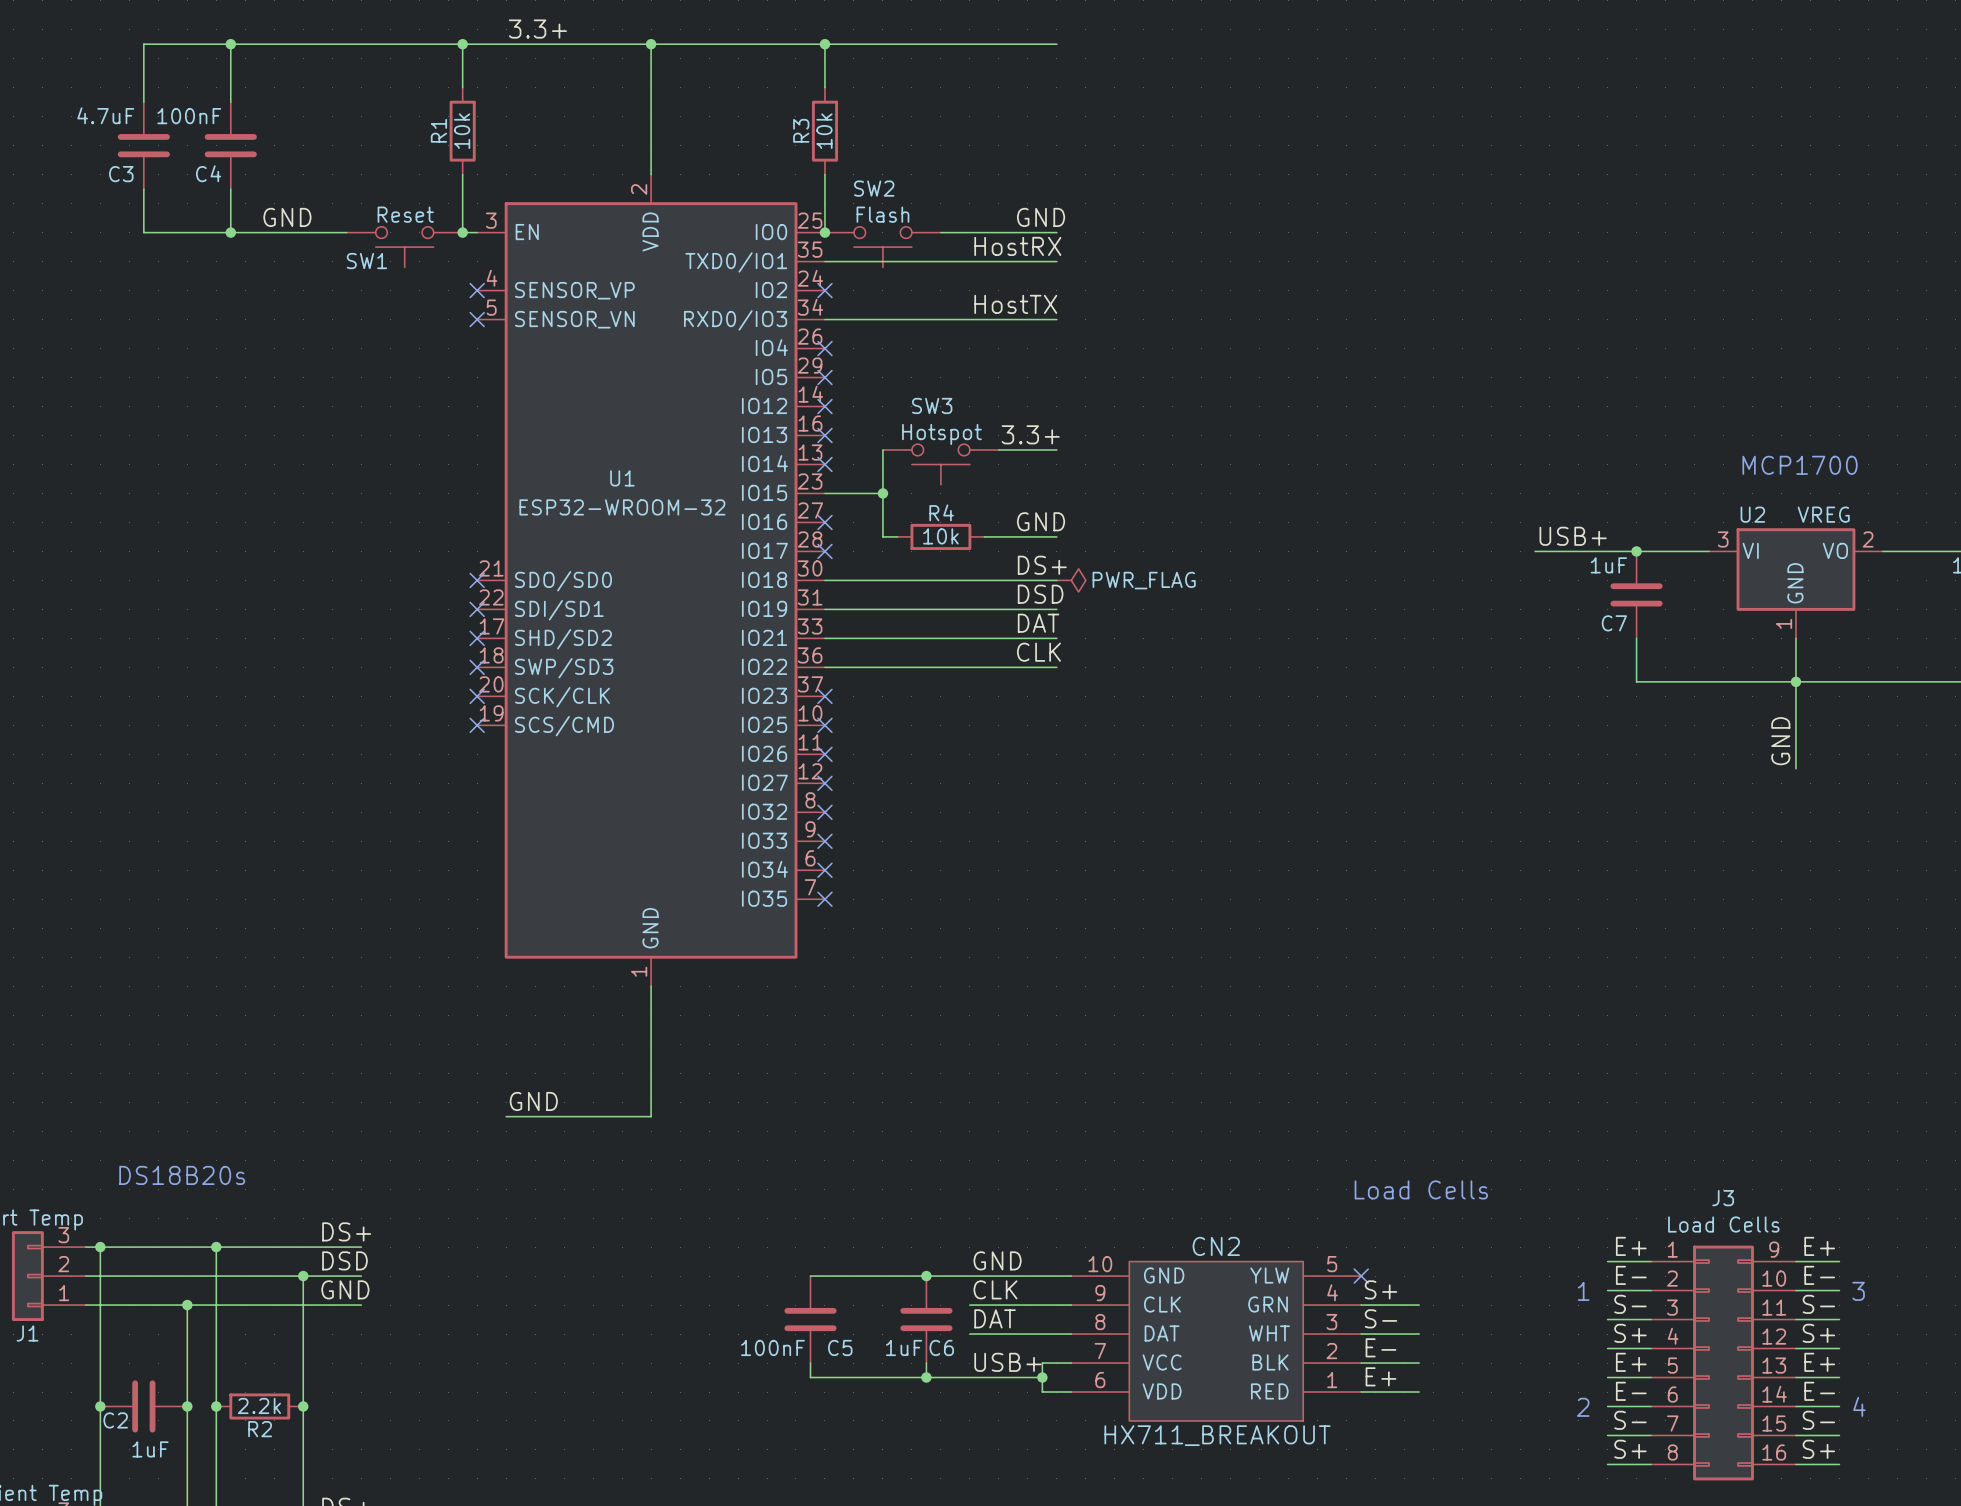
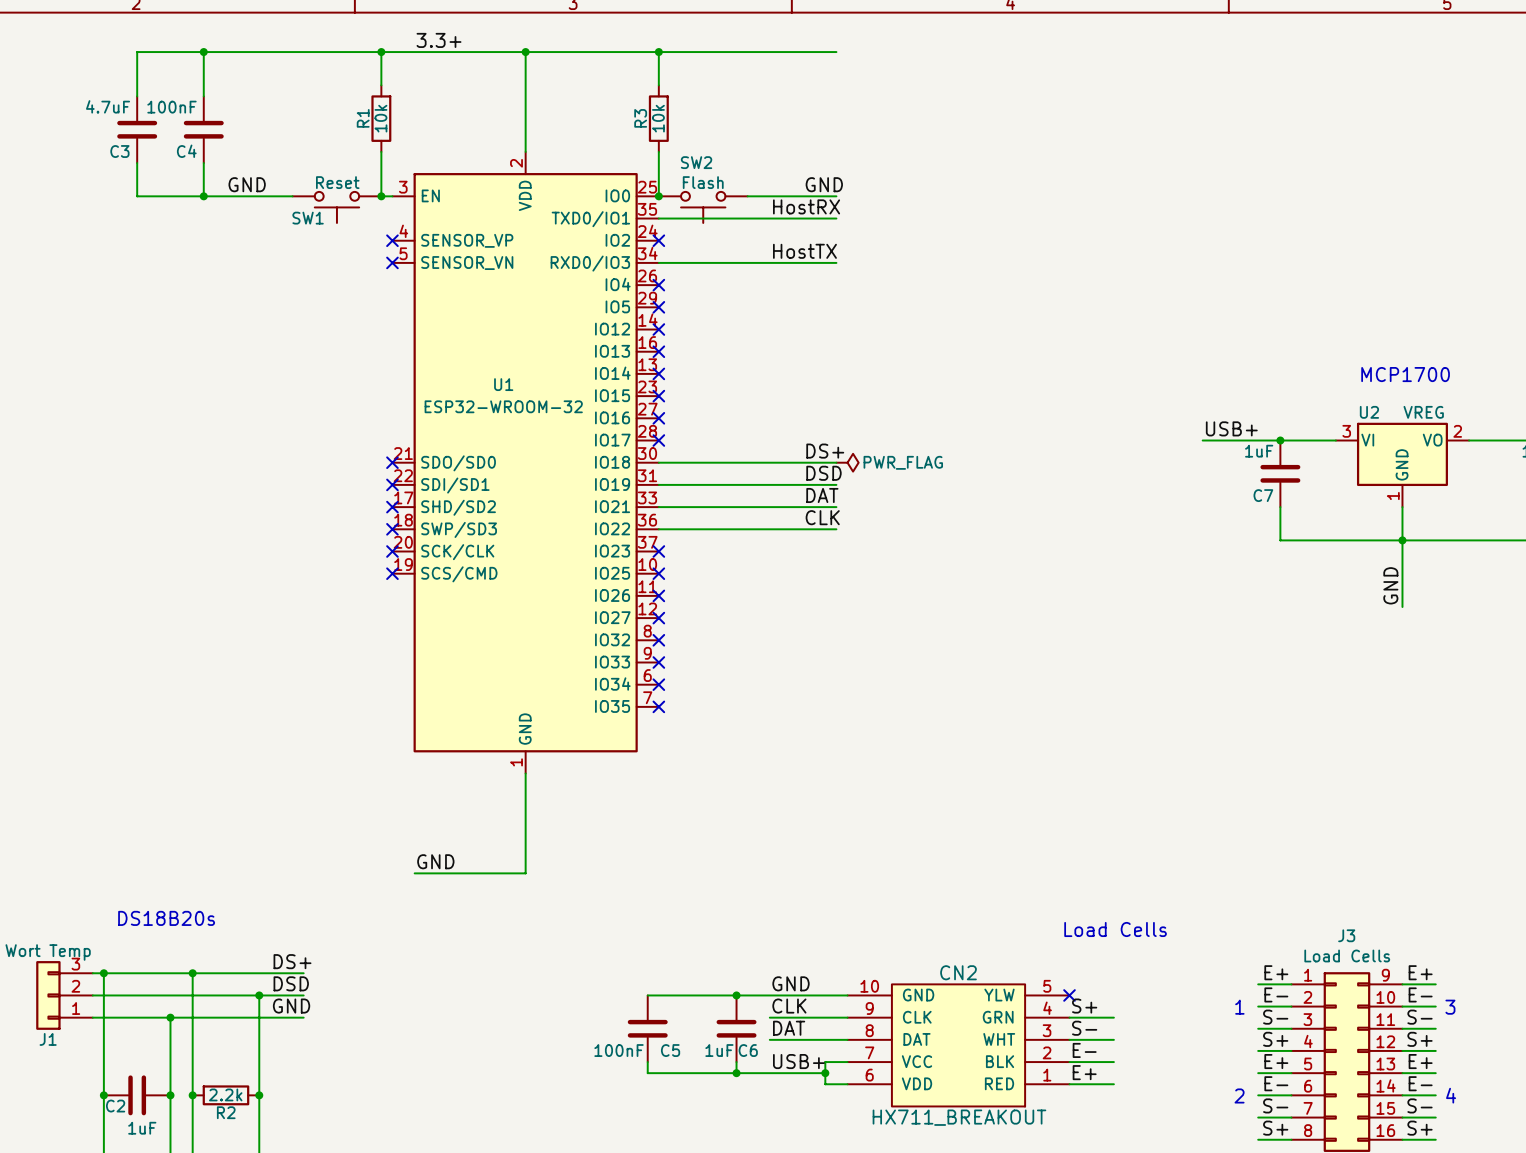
label: 3.3+ (1030, 434) -> none
wire: (882, 449) (882, 536) (897, 536) -> none
wire: (998, 449) (1056, 449) -> none
SW3: Hotspot (940, 464) -> none
wire: (824, 493) (882, 493) -> none
no-connect mark: none -> (658, 396)
junction: (882, 493) -> none
label: GND (1041, 521) -> none
R4: 10k (940, 536) -> none
wire: (984, 536) (1056, 536) -> none

